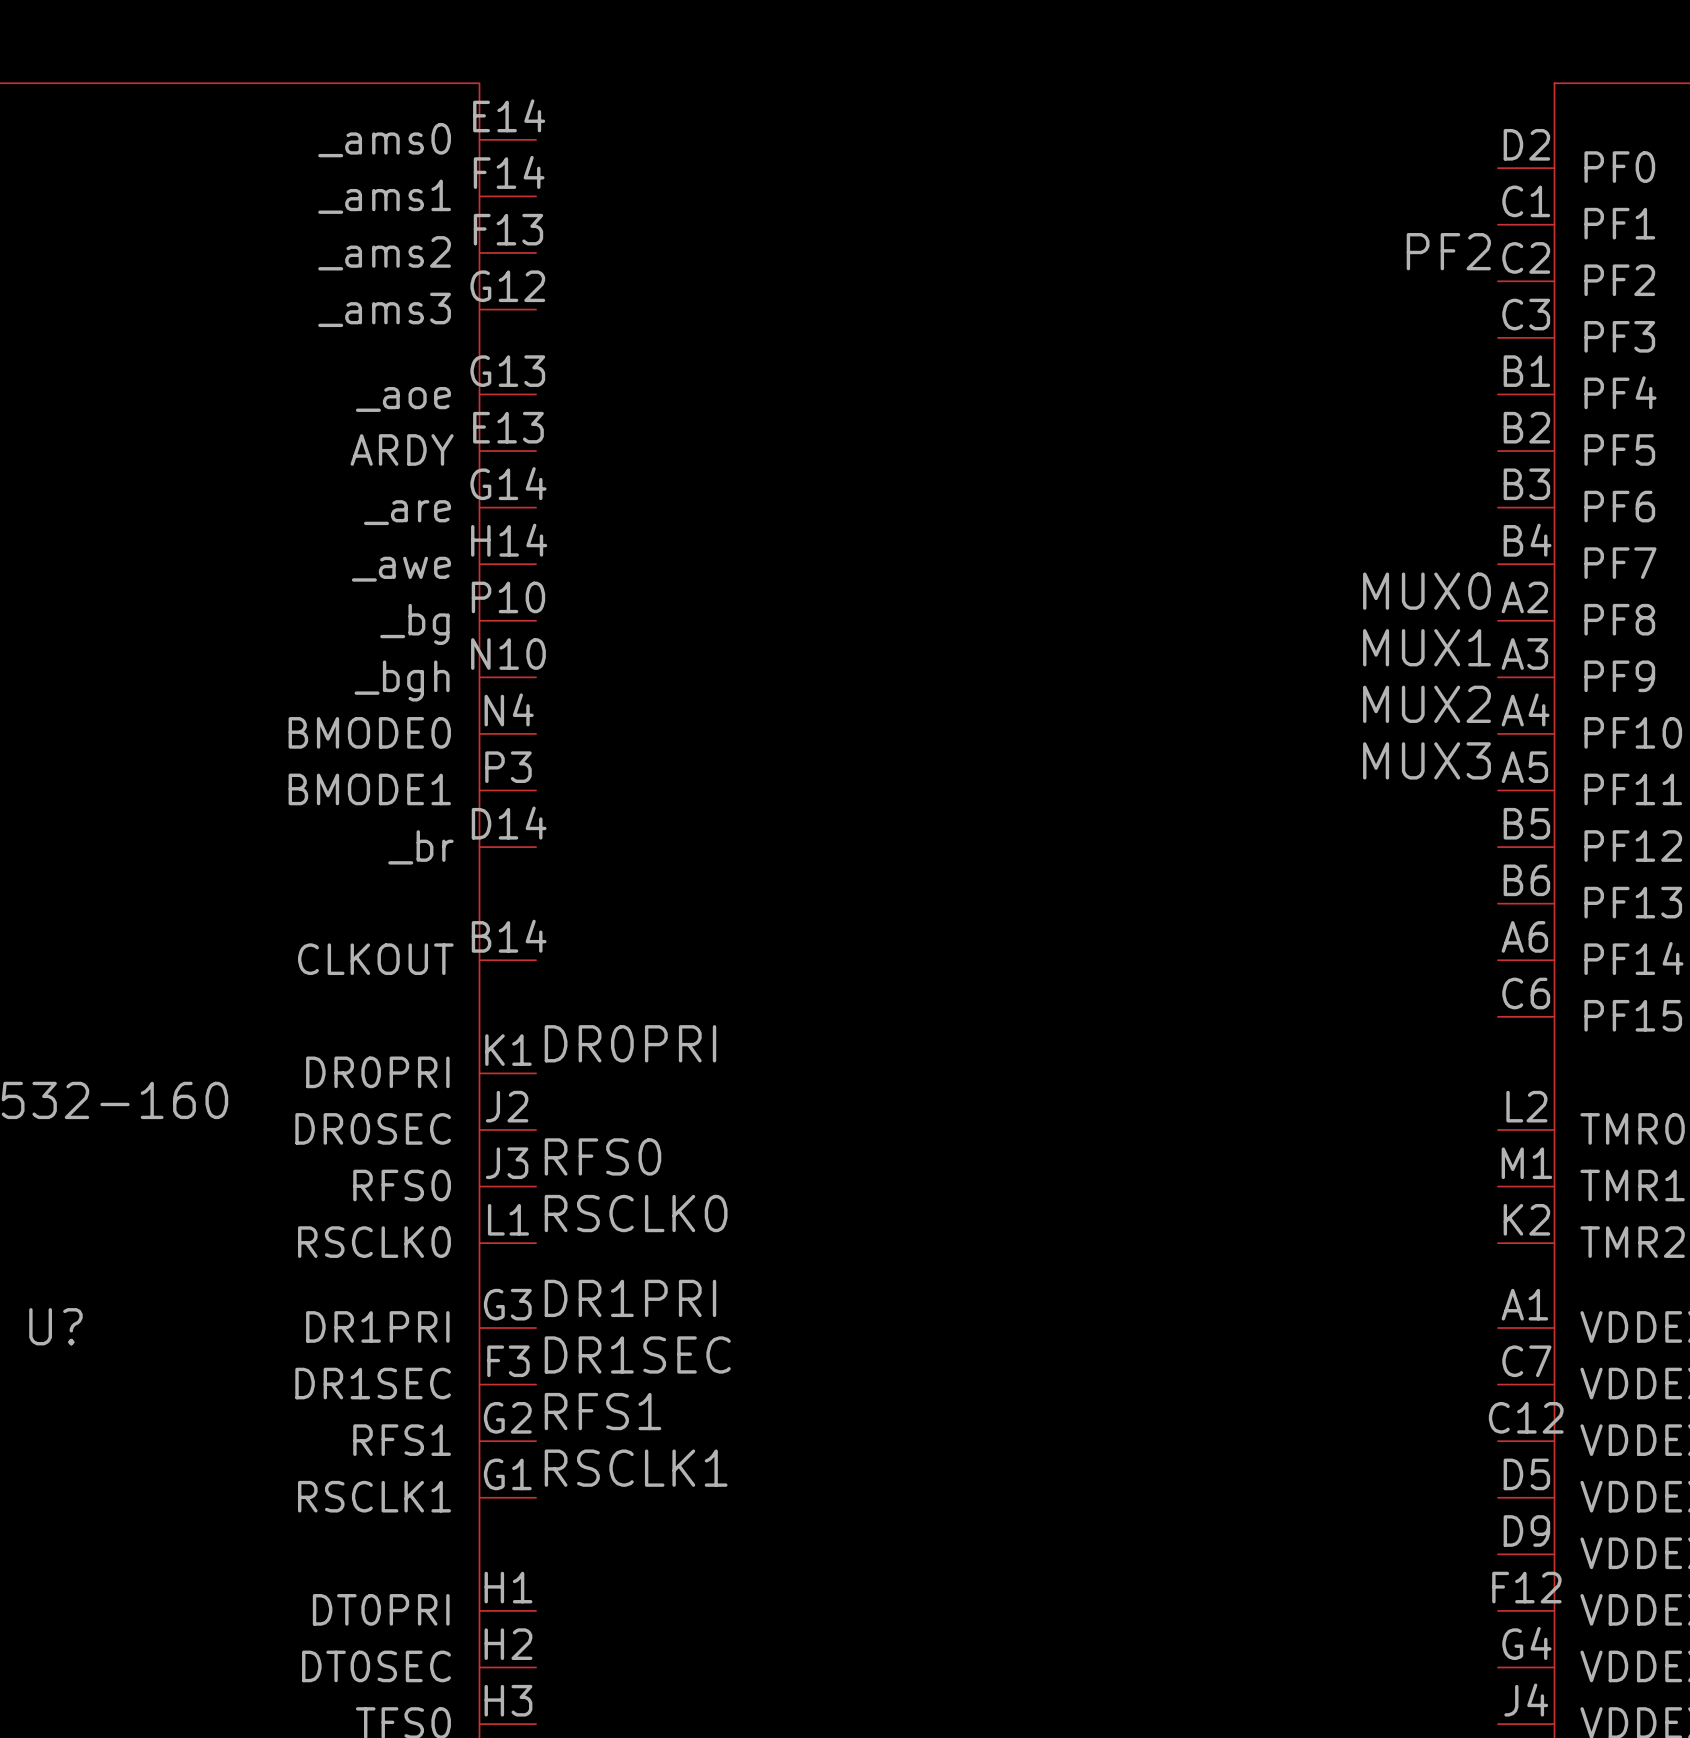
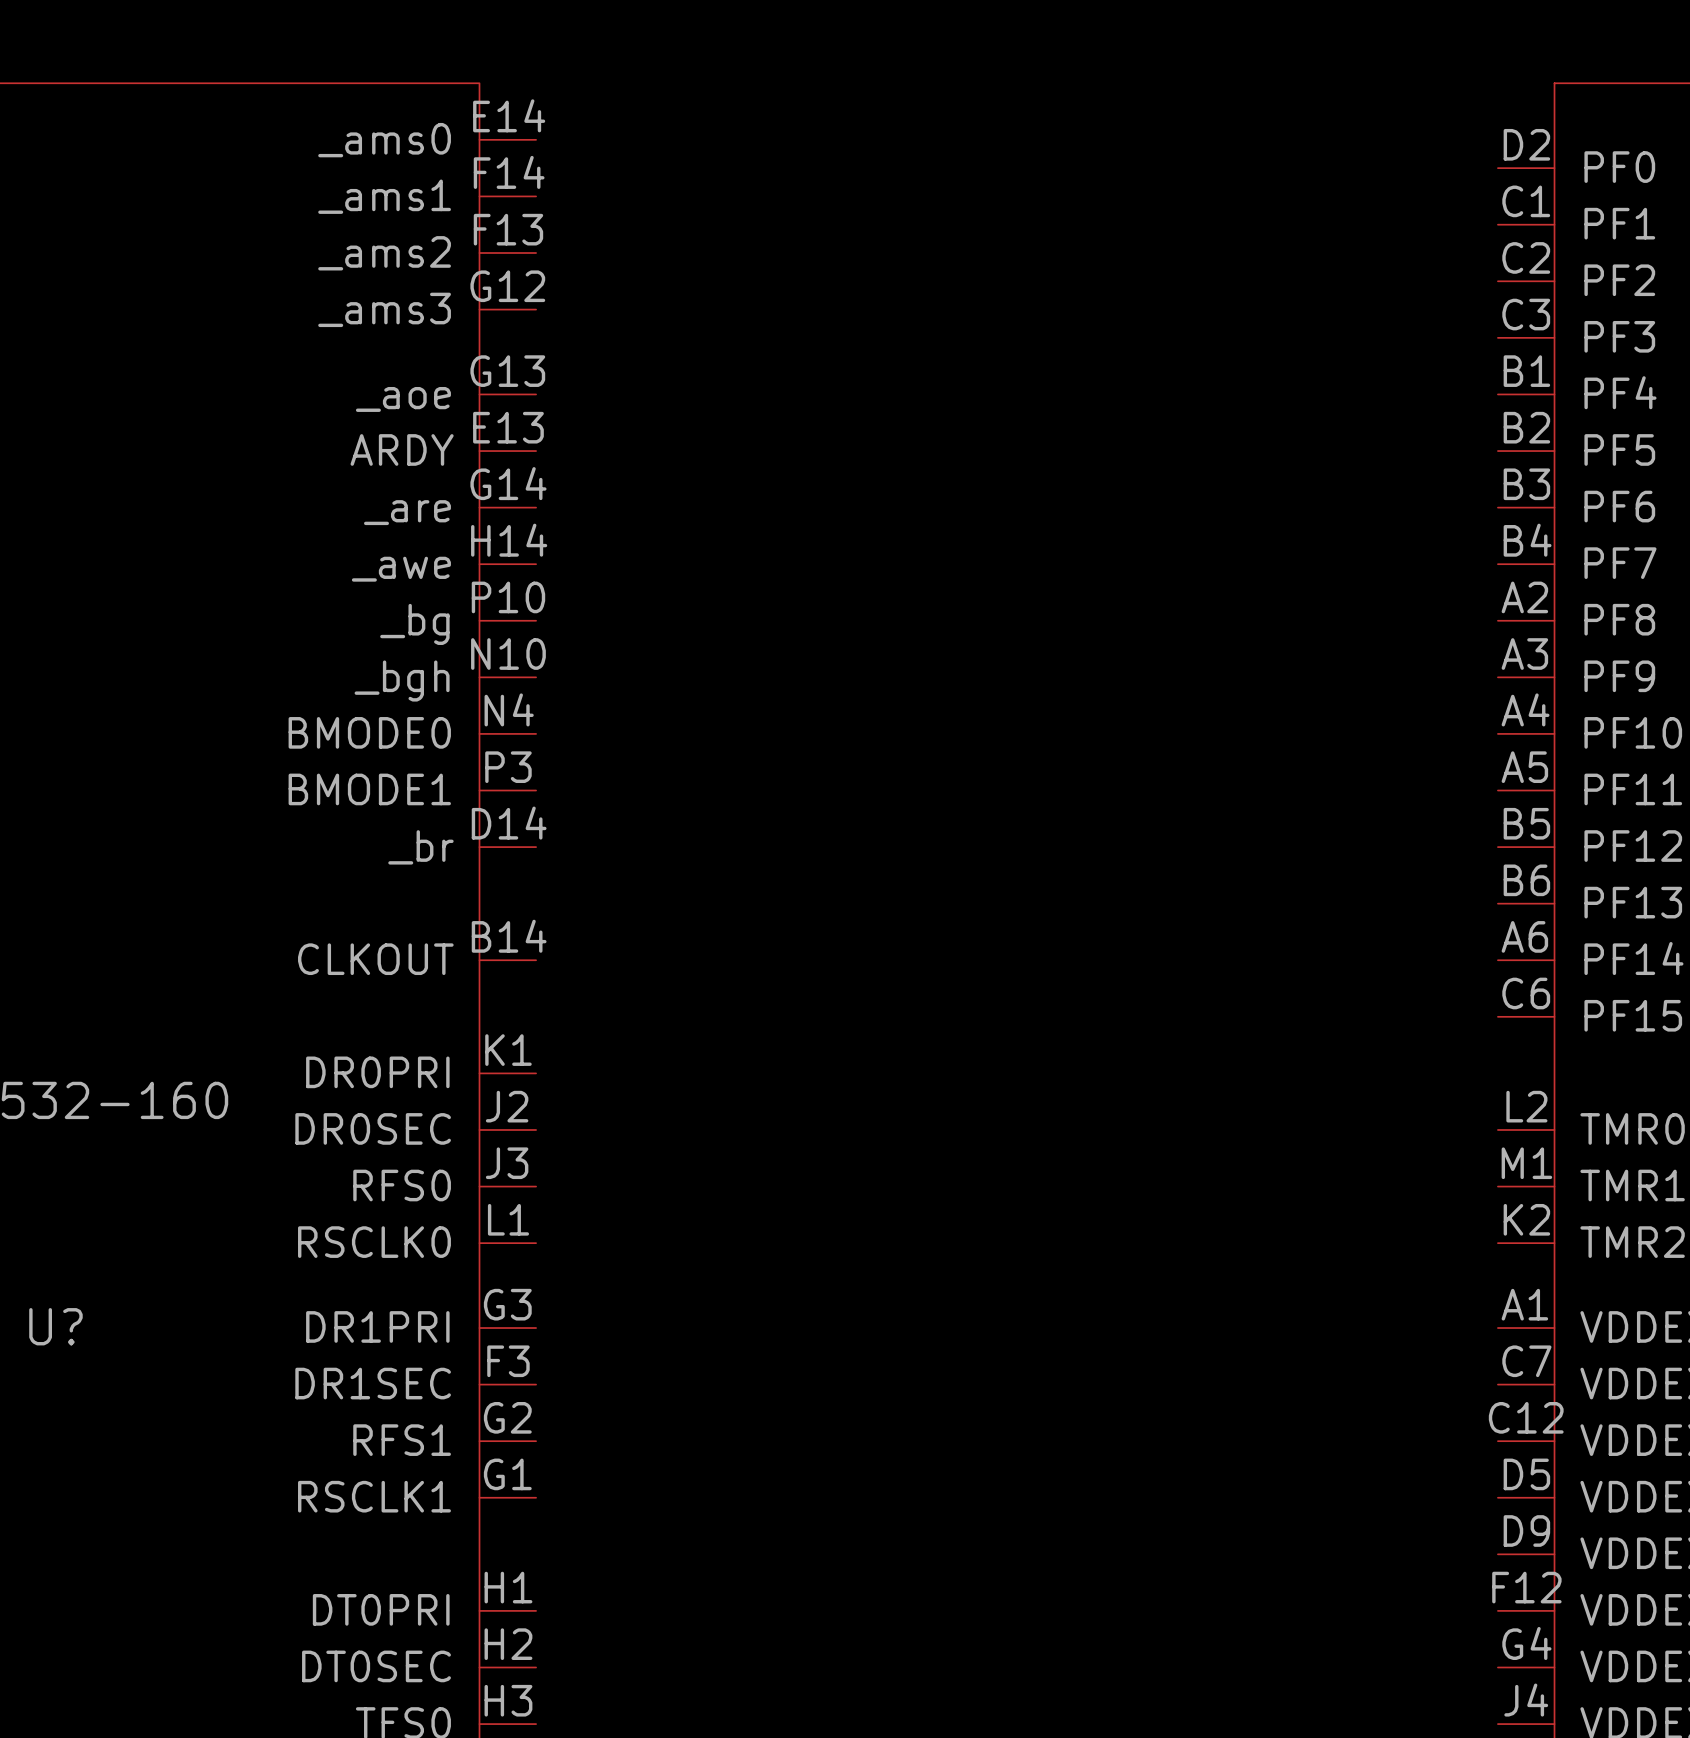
label: PF2 (1448, 251) -> none
label: MUX0 (1427, 591) -> none
label: MUX1 (1427, 647) -> none
label: MUX2 (1427, 704) -> none
label: MUX3 (1427, 760) -> none
label: DR0PRI (630, 1043) -> none
label: RFS0 (602, 1156) -> none
label: RSCLK0 (636, 1213) -> none
label: DR1PRI (630, 1298) -> none
label: DR1SEC (637, 1354) -> none
label: RFS1 (602, 1411) -> none
label: RSCLK1 (636, 1468) -> none

